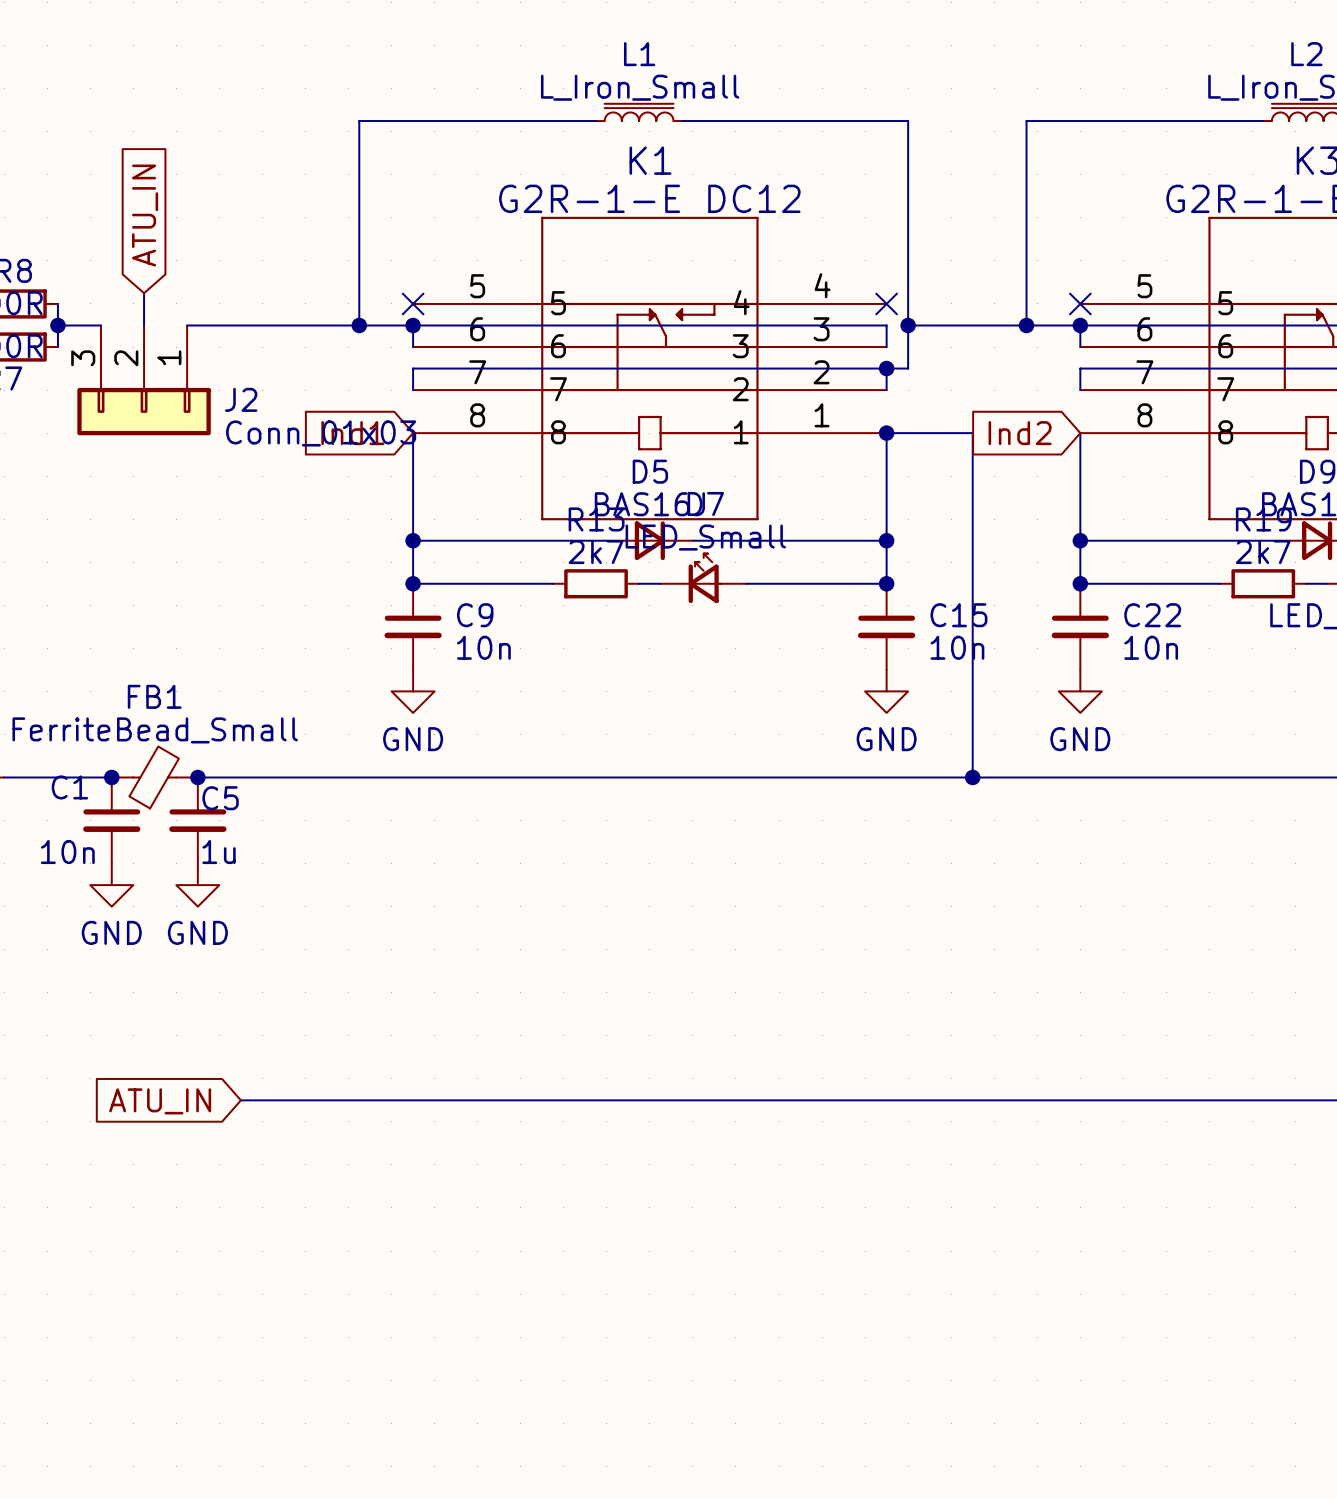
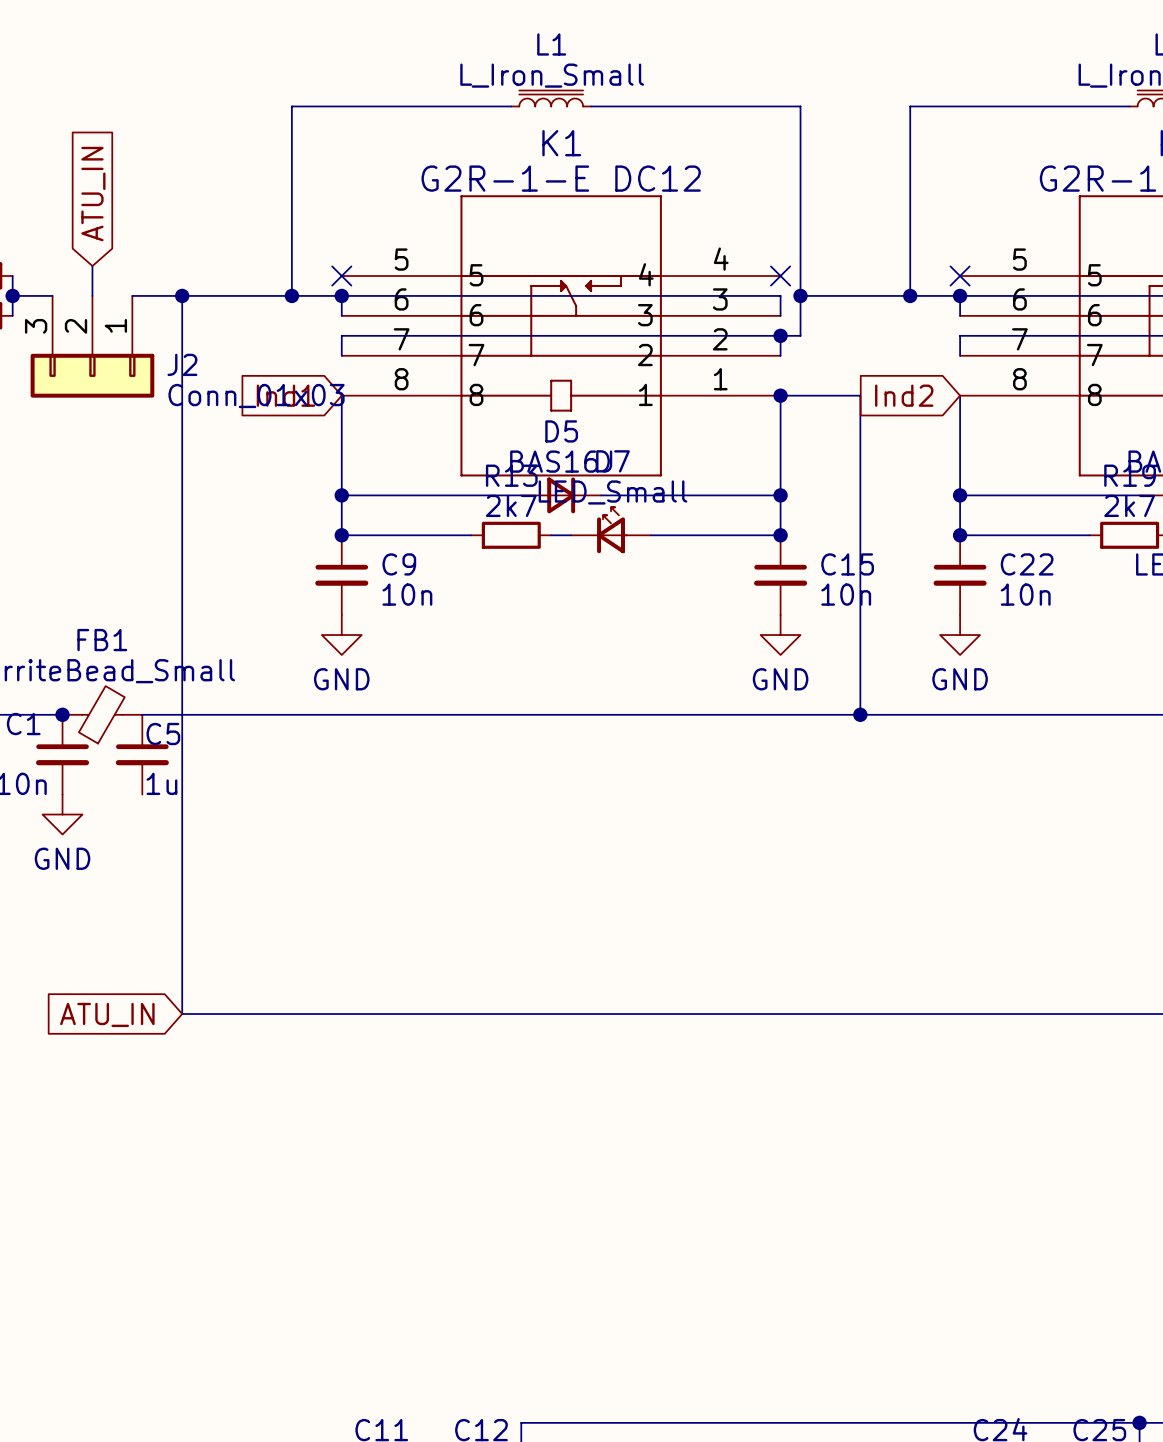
wire: none -> (182, 295) (182, 1013)
junction: none -> (182, 295)
junction: (197, 777) -> none
power symbol: GND (197, 885) -> none

